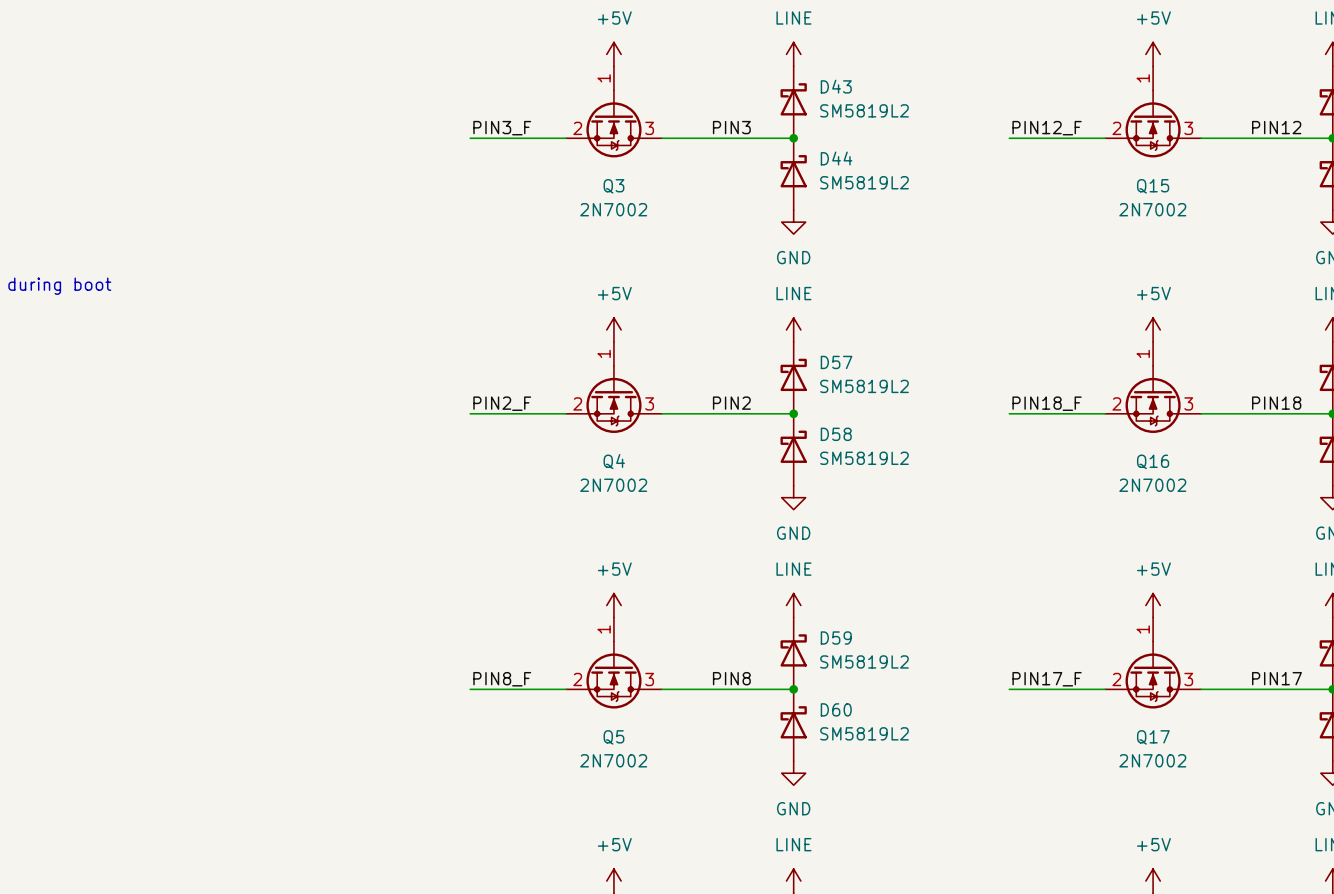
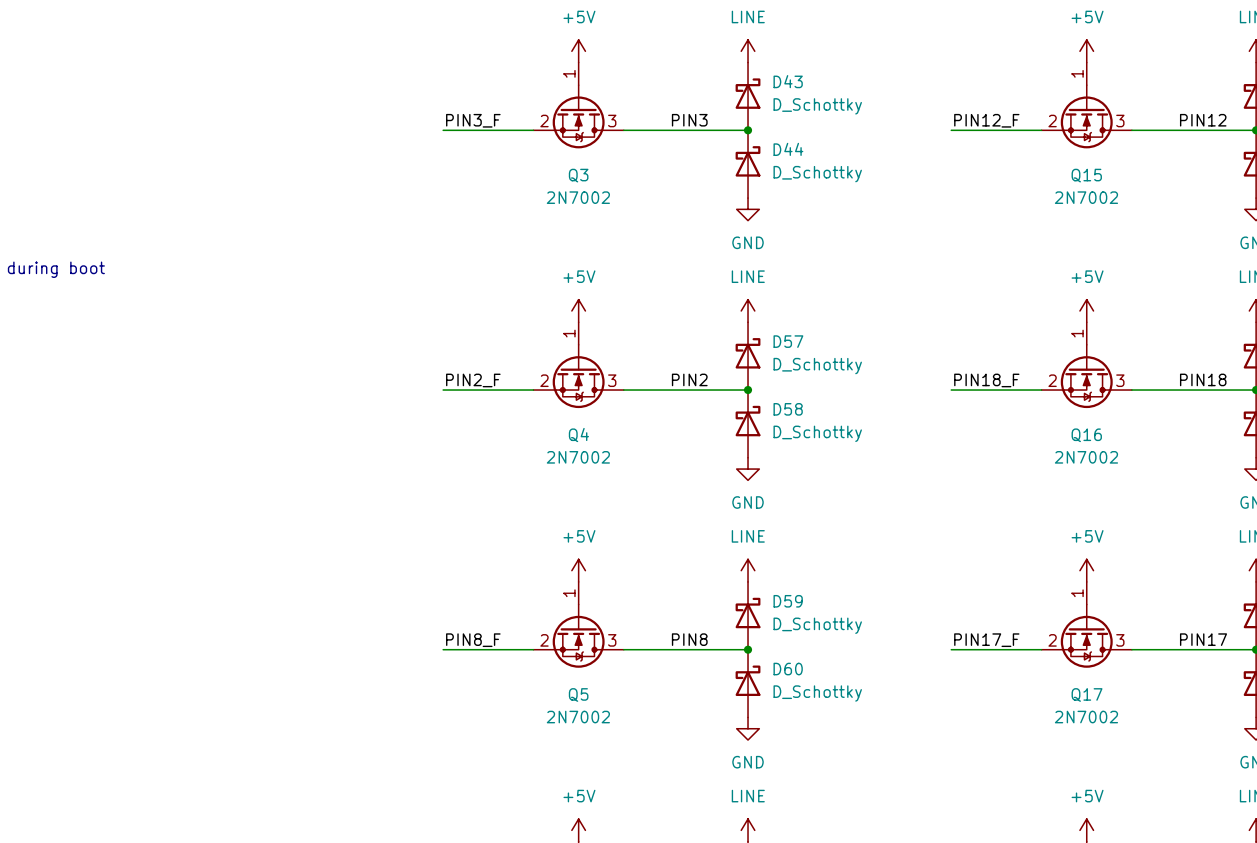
D43 value: SM5819L2 (864, 110) -> D_Schottky (817, 106)
D44 value: SM5819L2 (864, 182) -> D_Schottky (817, 174)
D57 value: SM5819L2 (864, 386) -> D_Schottky (817, 366)
D58 value: SM5819L2 (864, 458) -> D_Schottky (817, 433)
D59 value: SM5819L2 (864, 661) -> D_Schottky (817, 625)
D60 value: SM5819L2 (864, 733) -> D_Schottky (817, 693)

